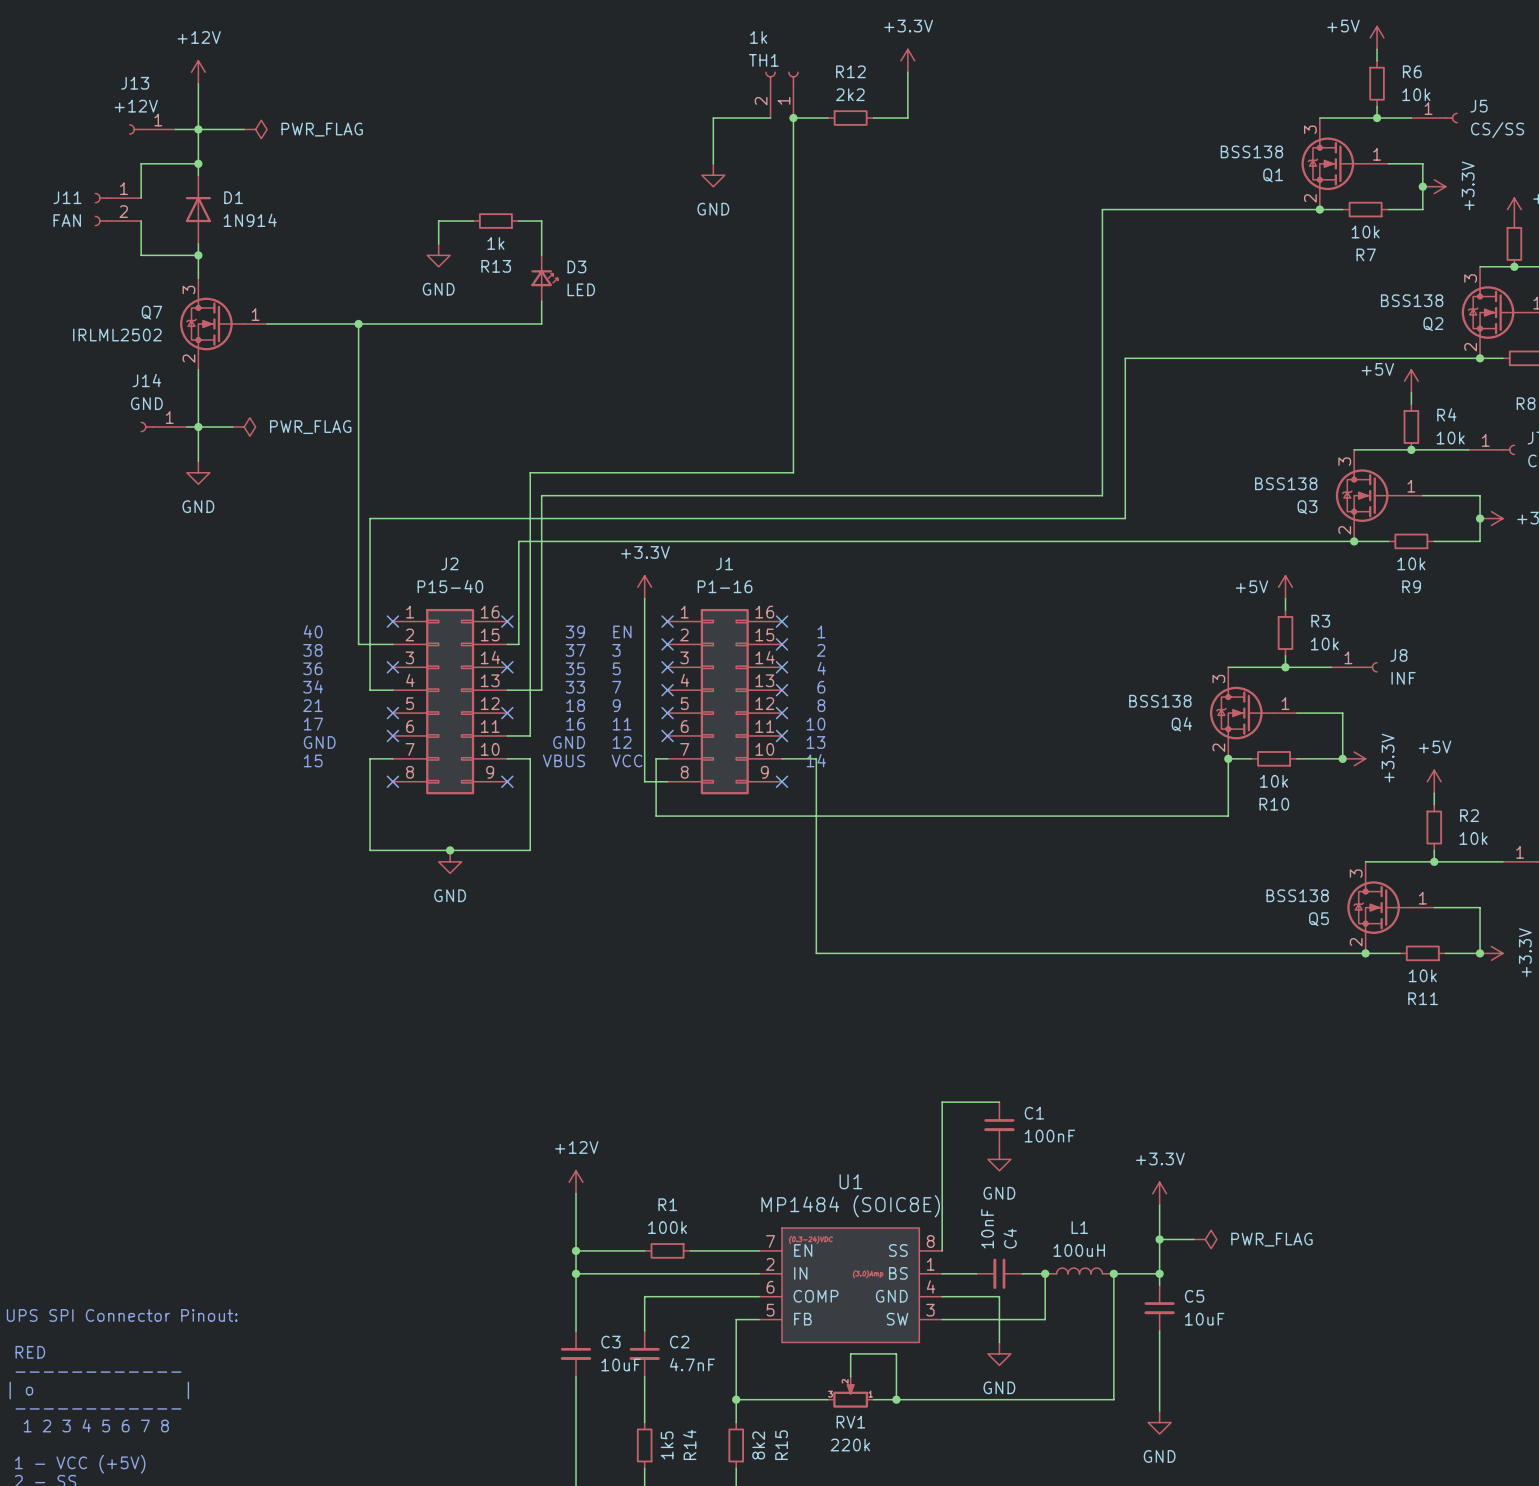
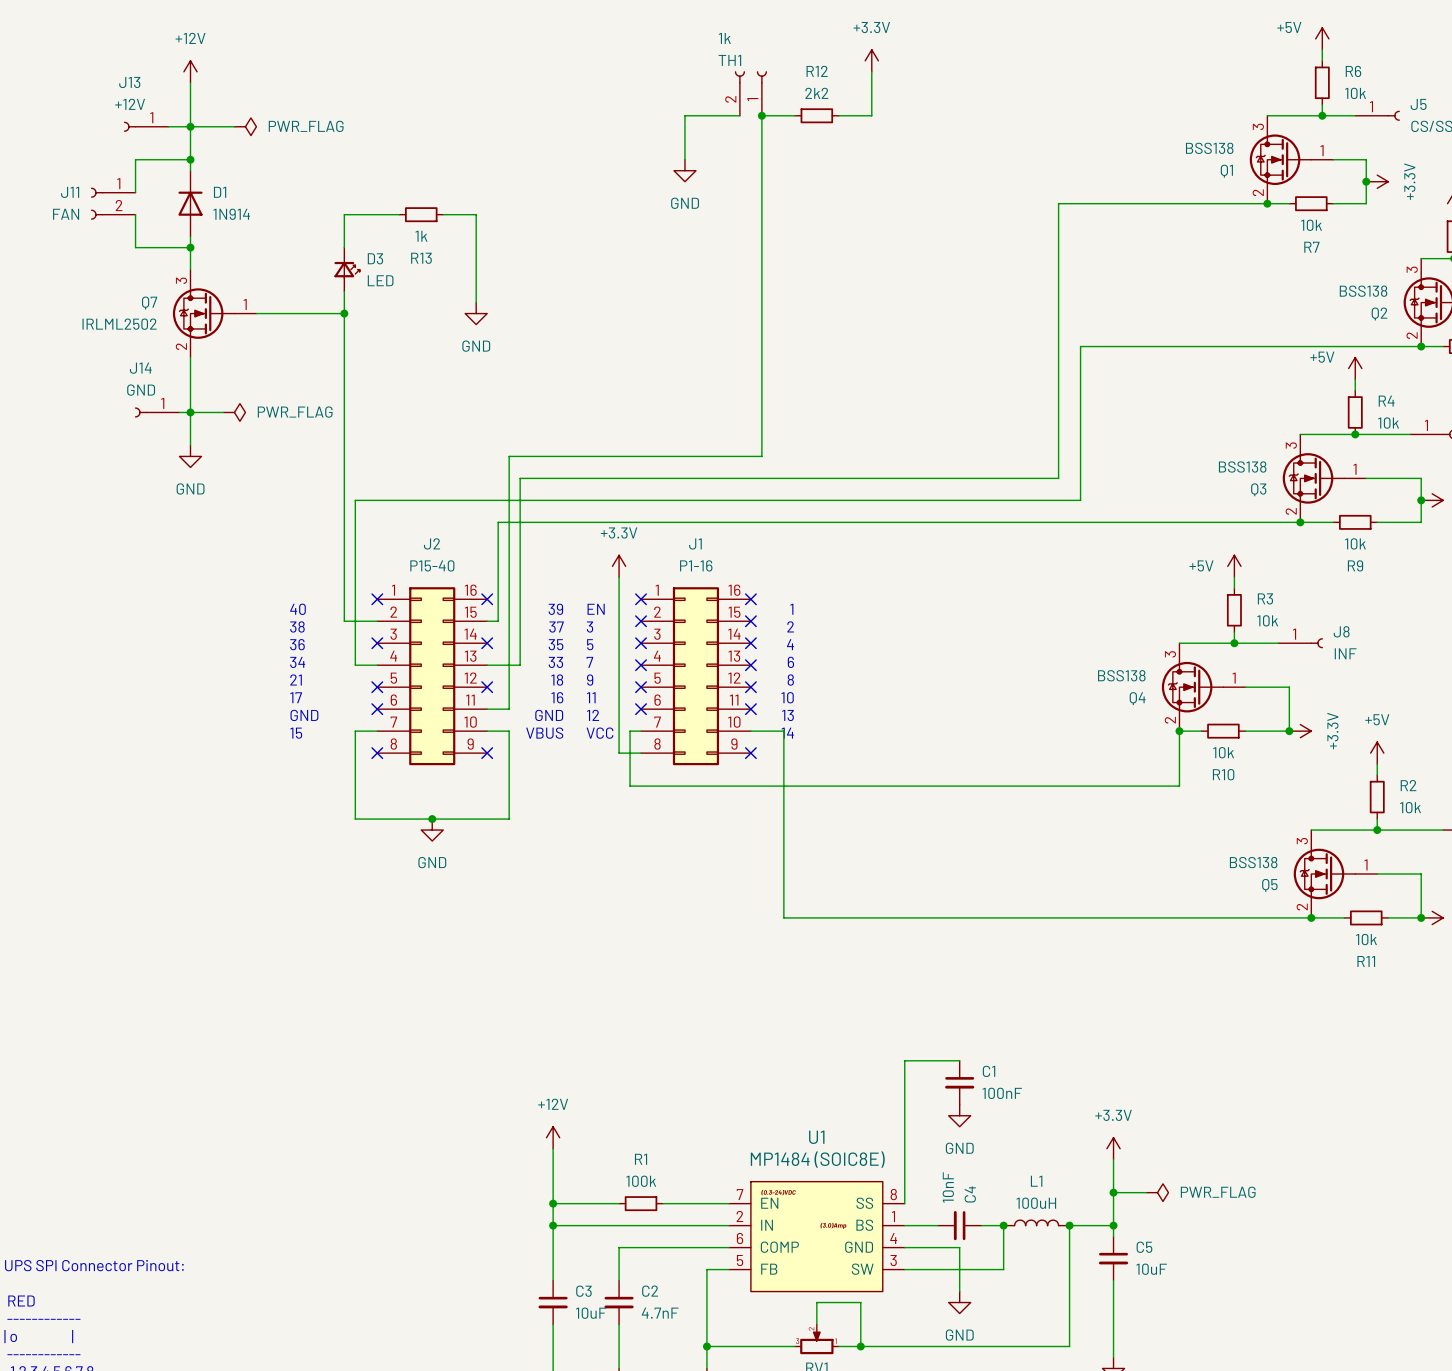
wire: none -> (399, 214) (344, 214) (344, 247)
wire: (461, 221) (438, 221) (438, 243) -> none
wire: none -> (454, 214) (476, 214) (476, 302)
R13 position: (495, 221) -> (421, 214)
wire: (518, 221) (541, 221) (541, 255) -> none
power symbol position: GND (438, 255) -> GND (476, 313)
D3 position: (544, 278) -> (347, 269)
wire: (541, 301) (541, 324) (358, 324) -> (344, 291) (344, 313)

